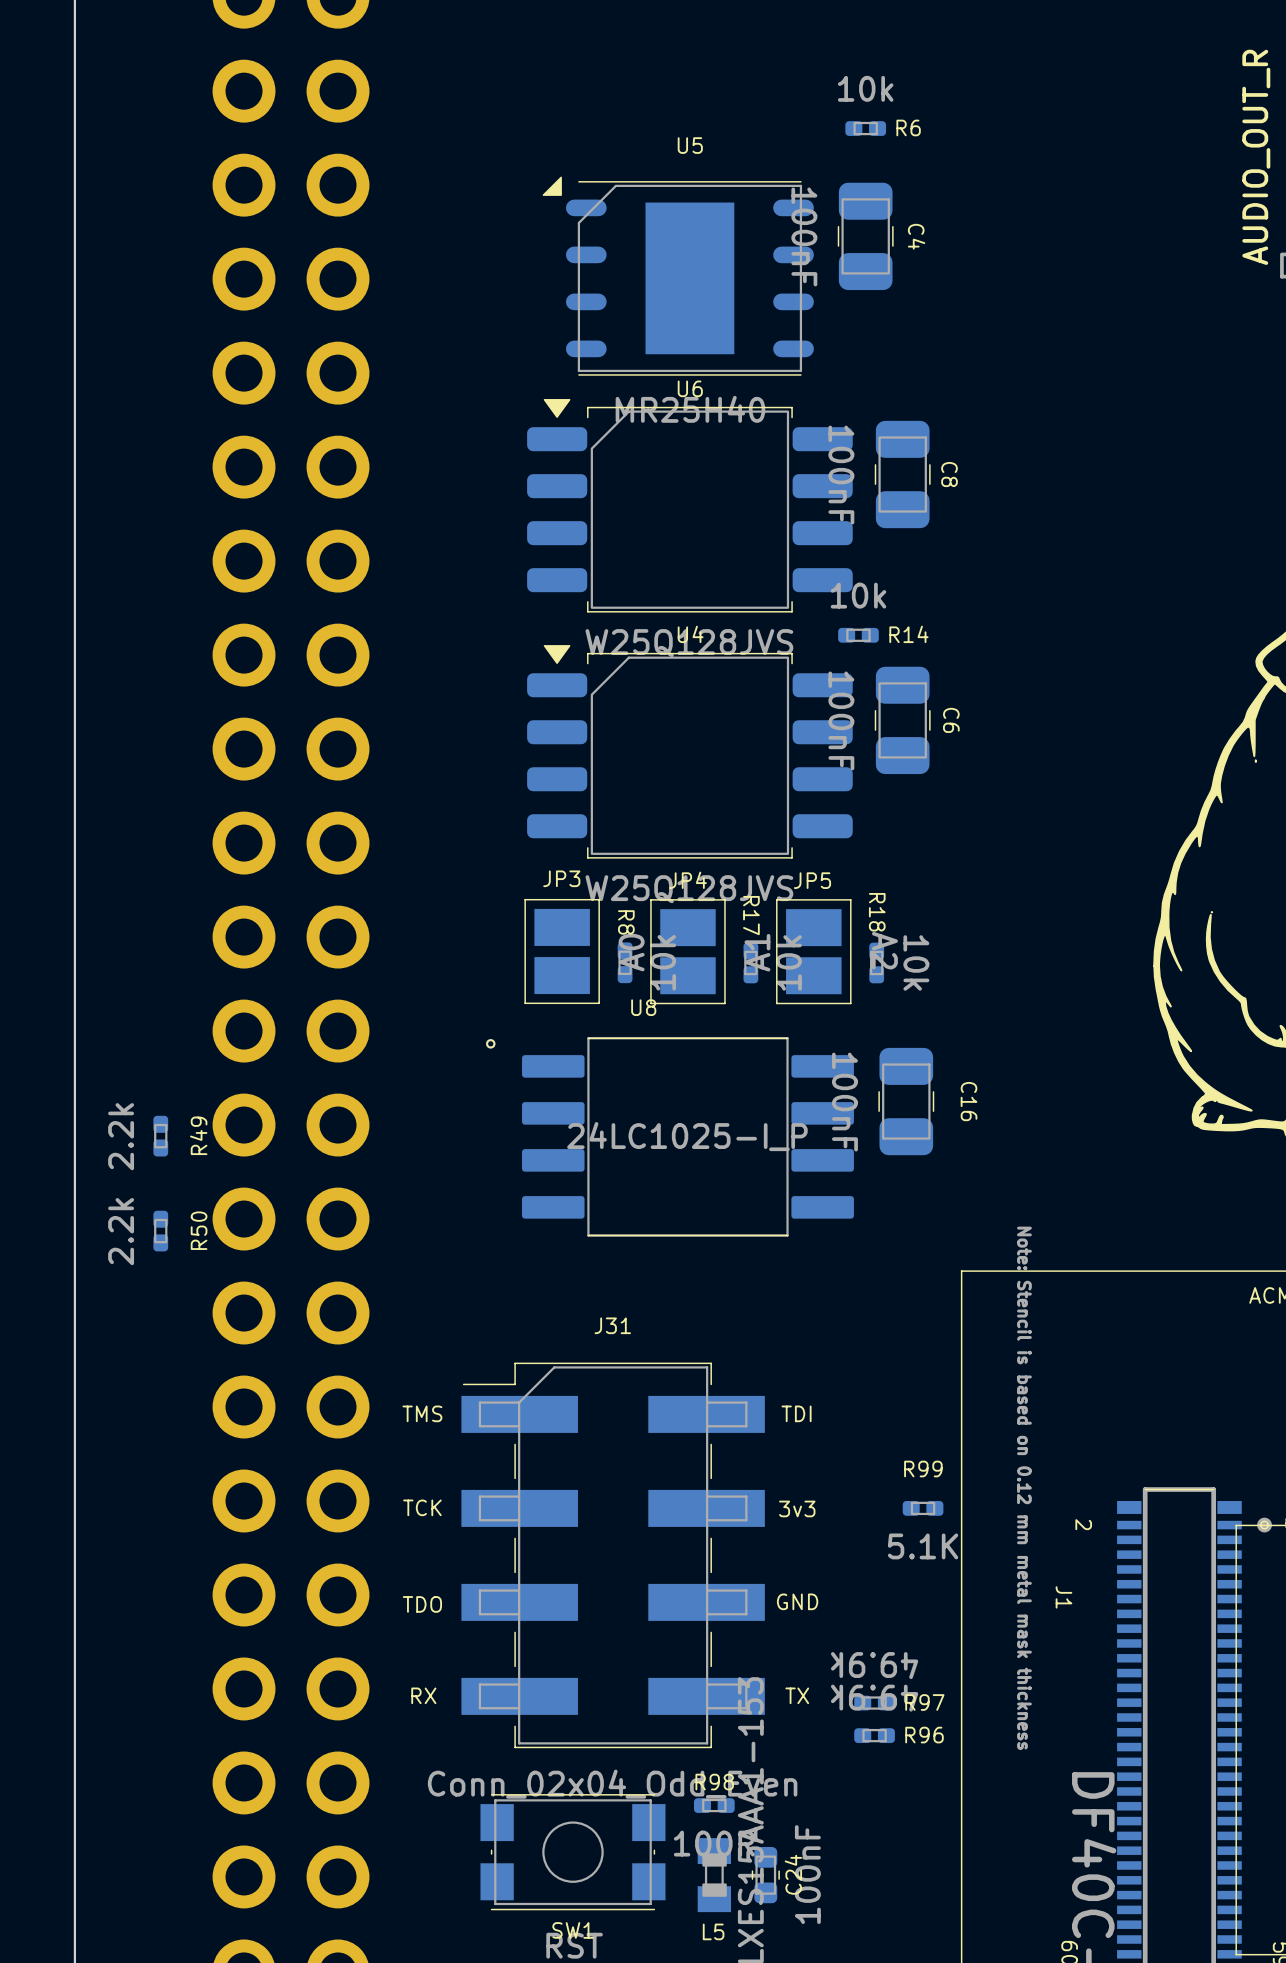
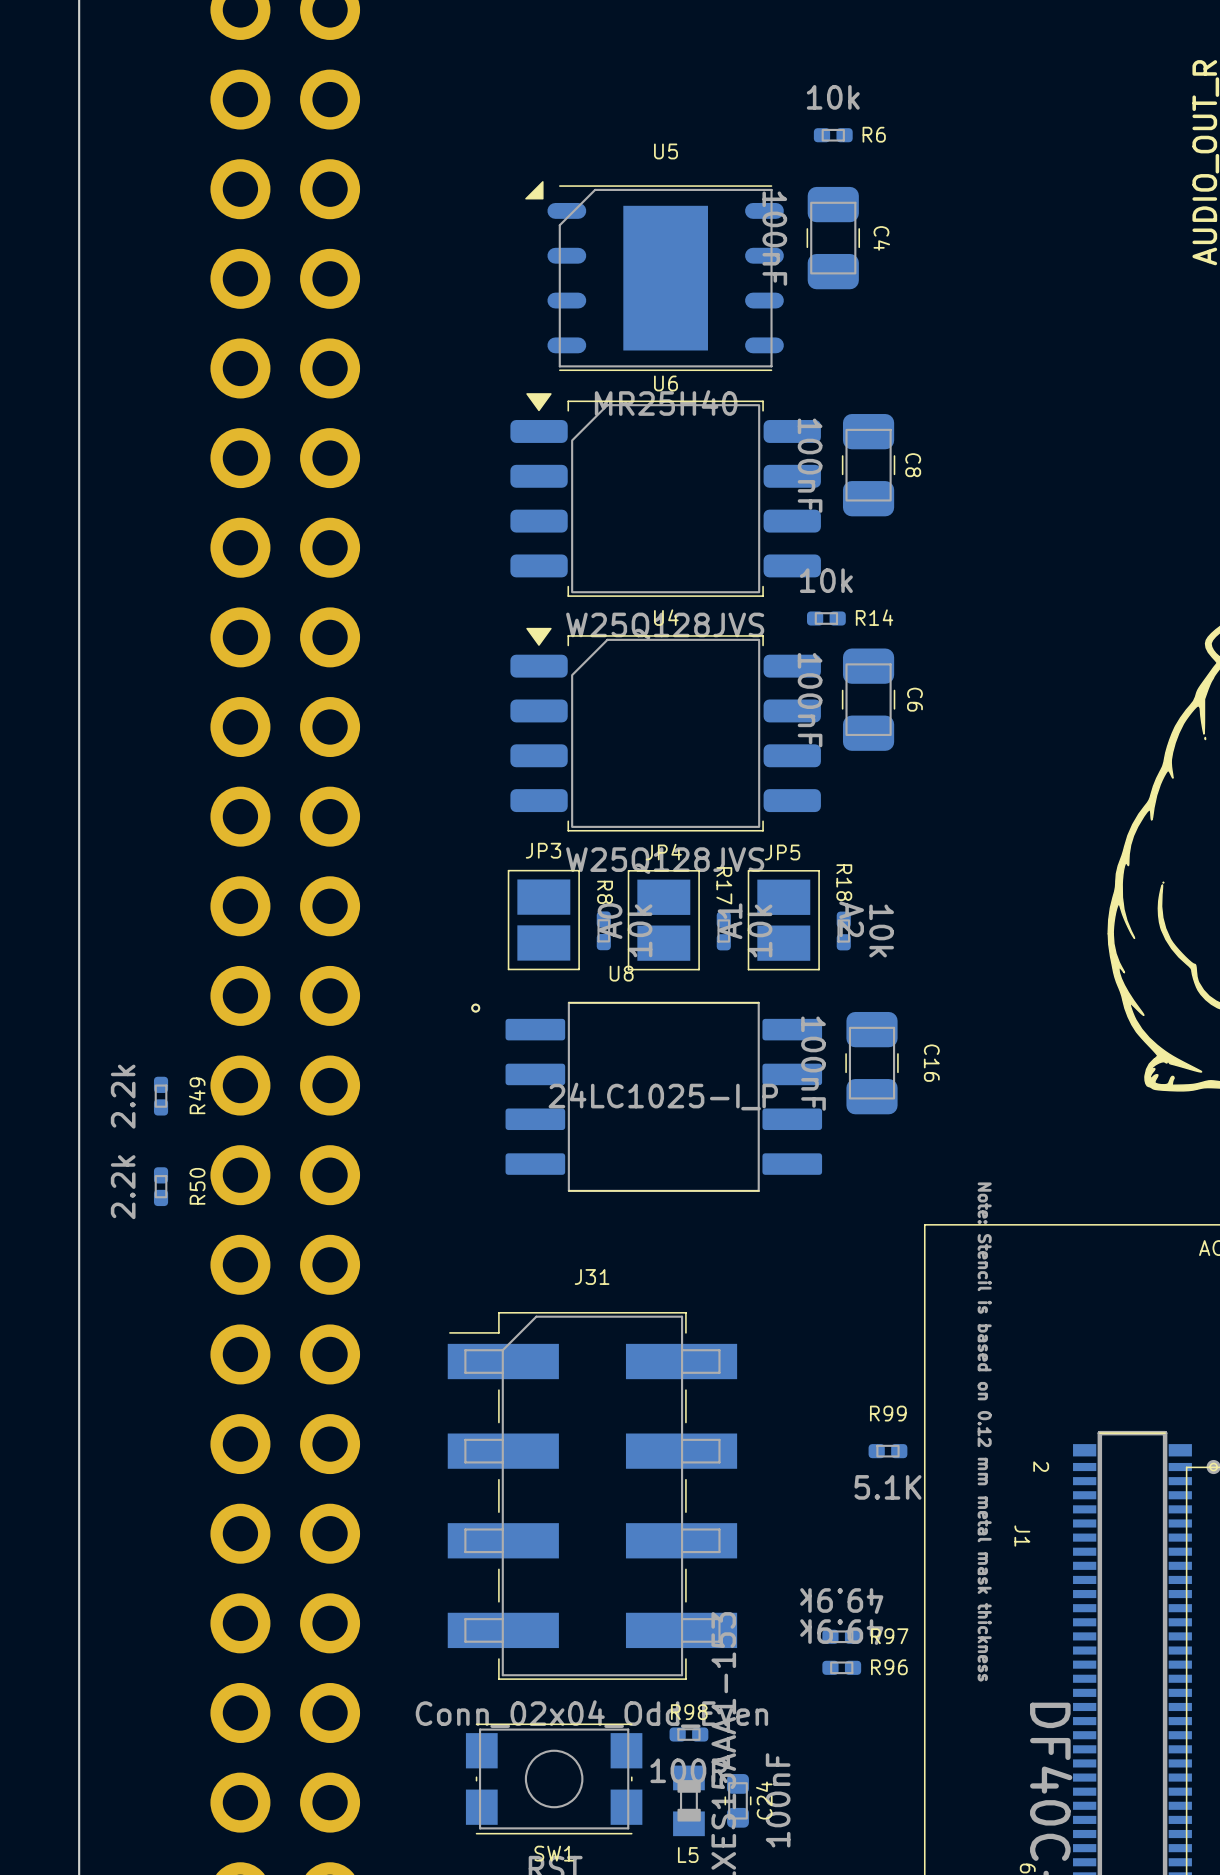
text: TMS (422, 1413) -> none
text: TDI (796, 1413) -> none
text: TCK (422, 1507) -> none
text: 3v3 (797, 1508) -> none
text: GND (797, 1601) -> none
text: TDO (422, 1604) -> none
text: RX (423, 1695) -> none
text: TX (797, 1695) -> none

